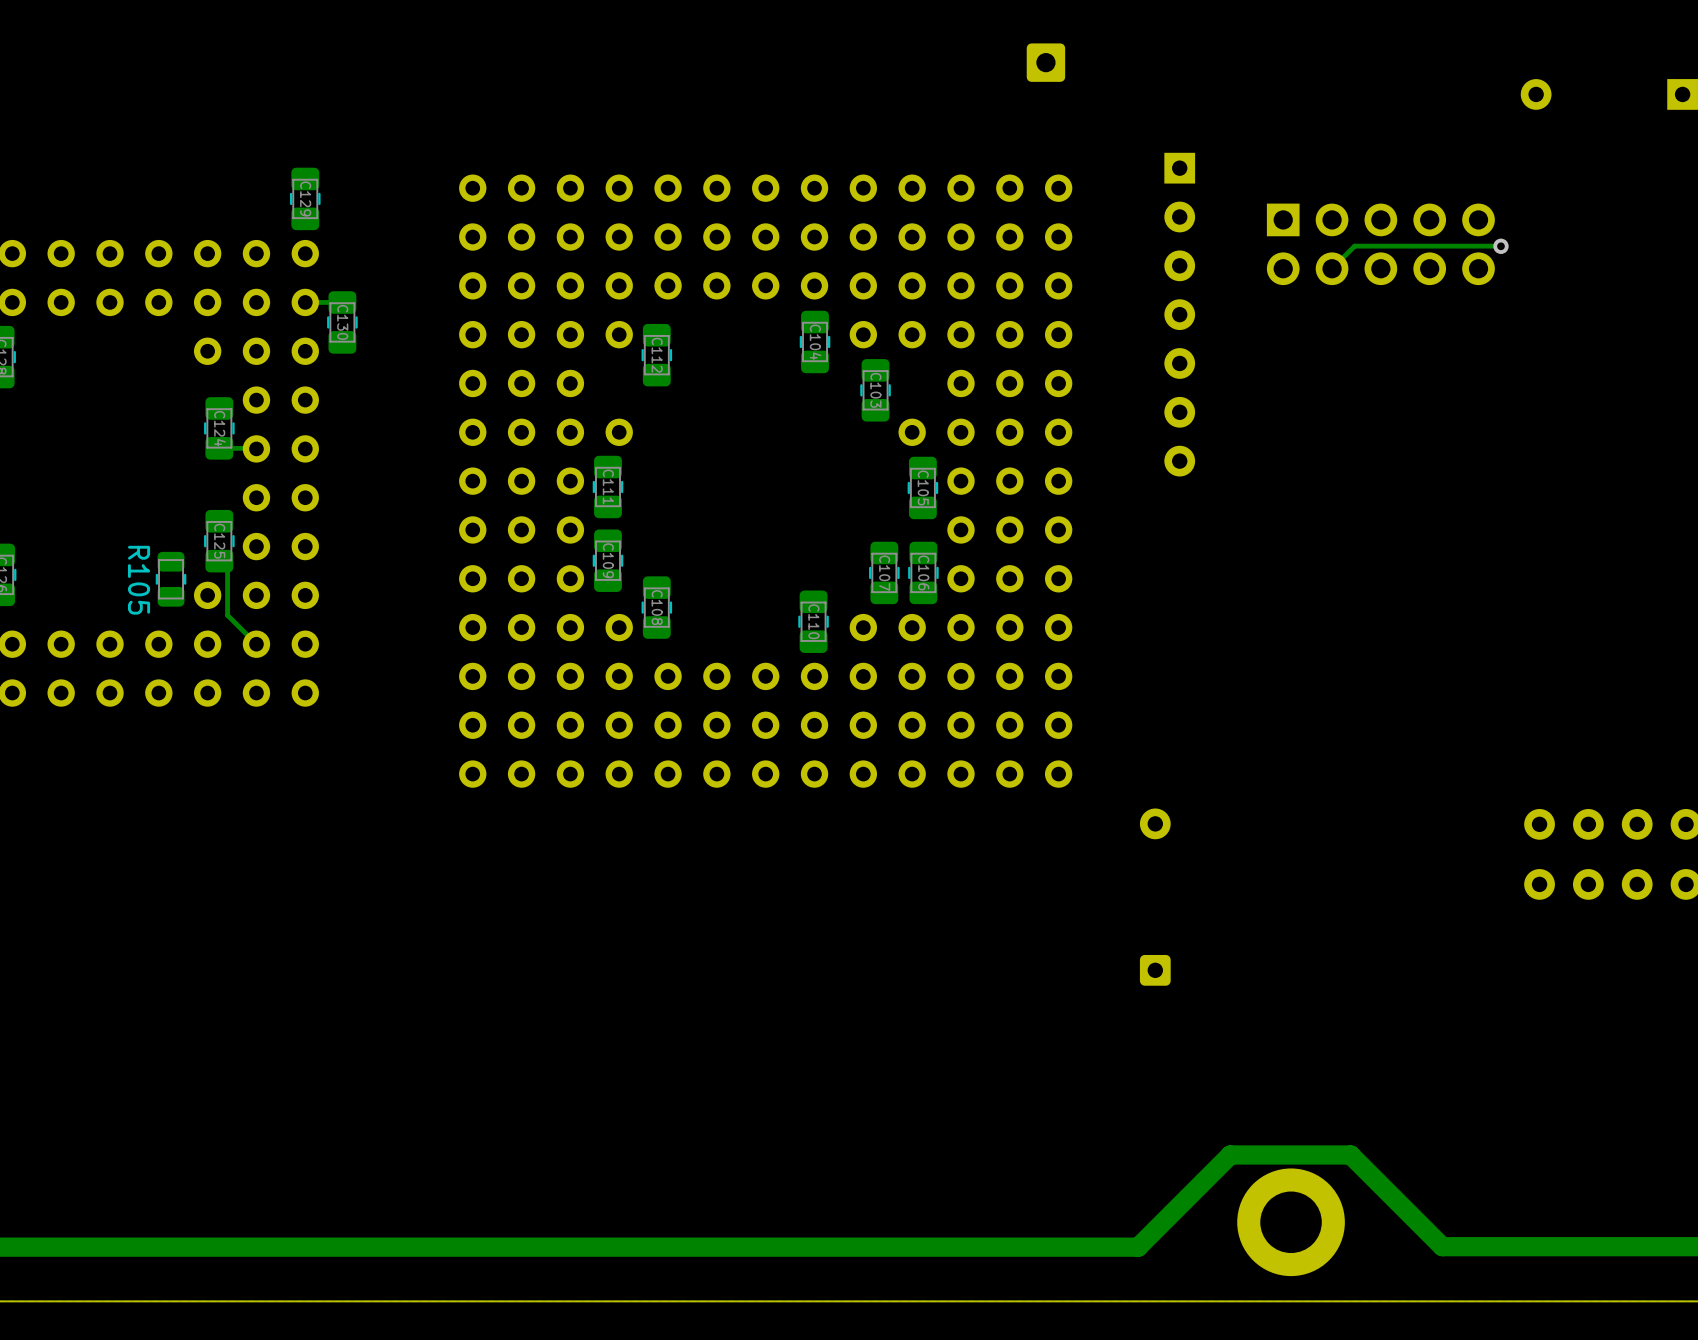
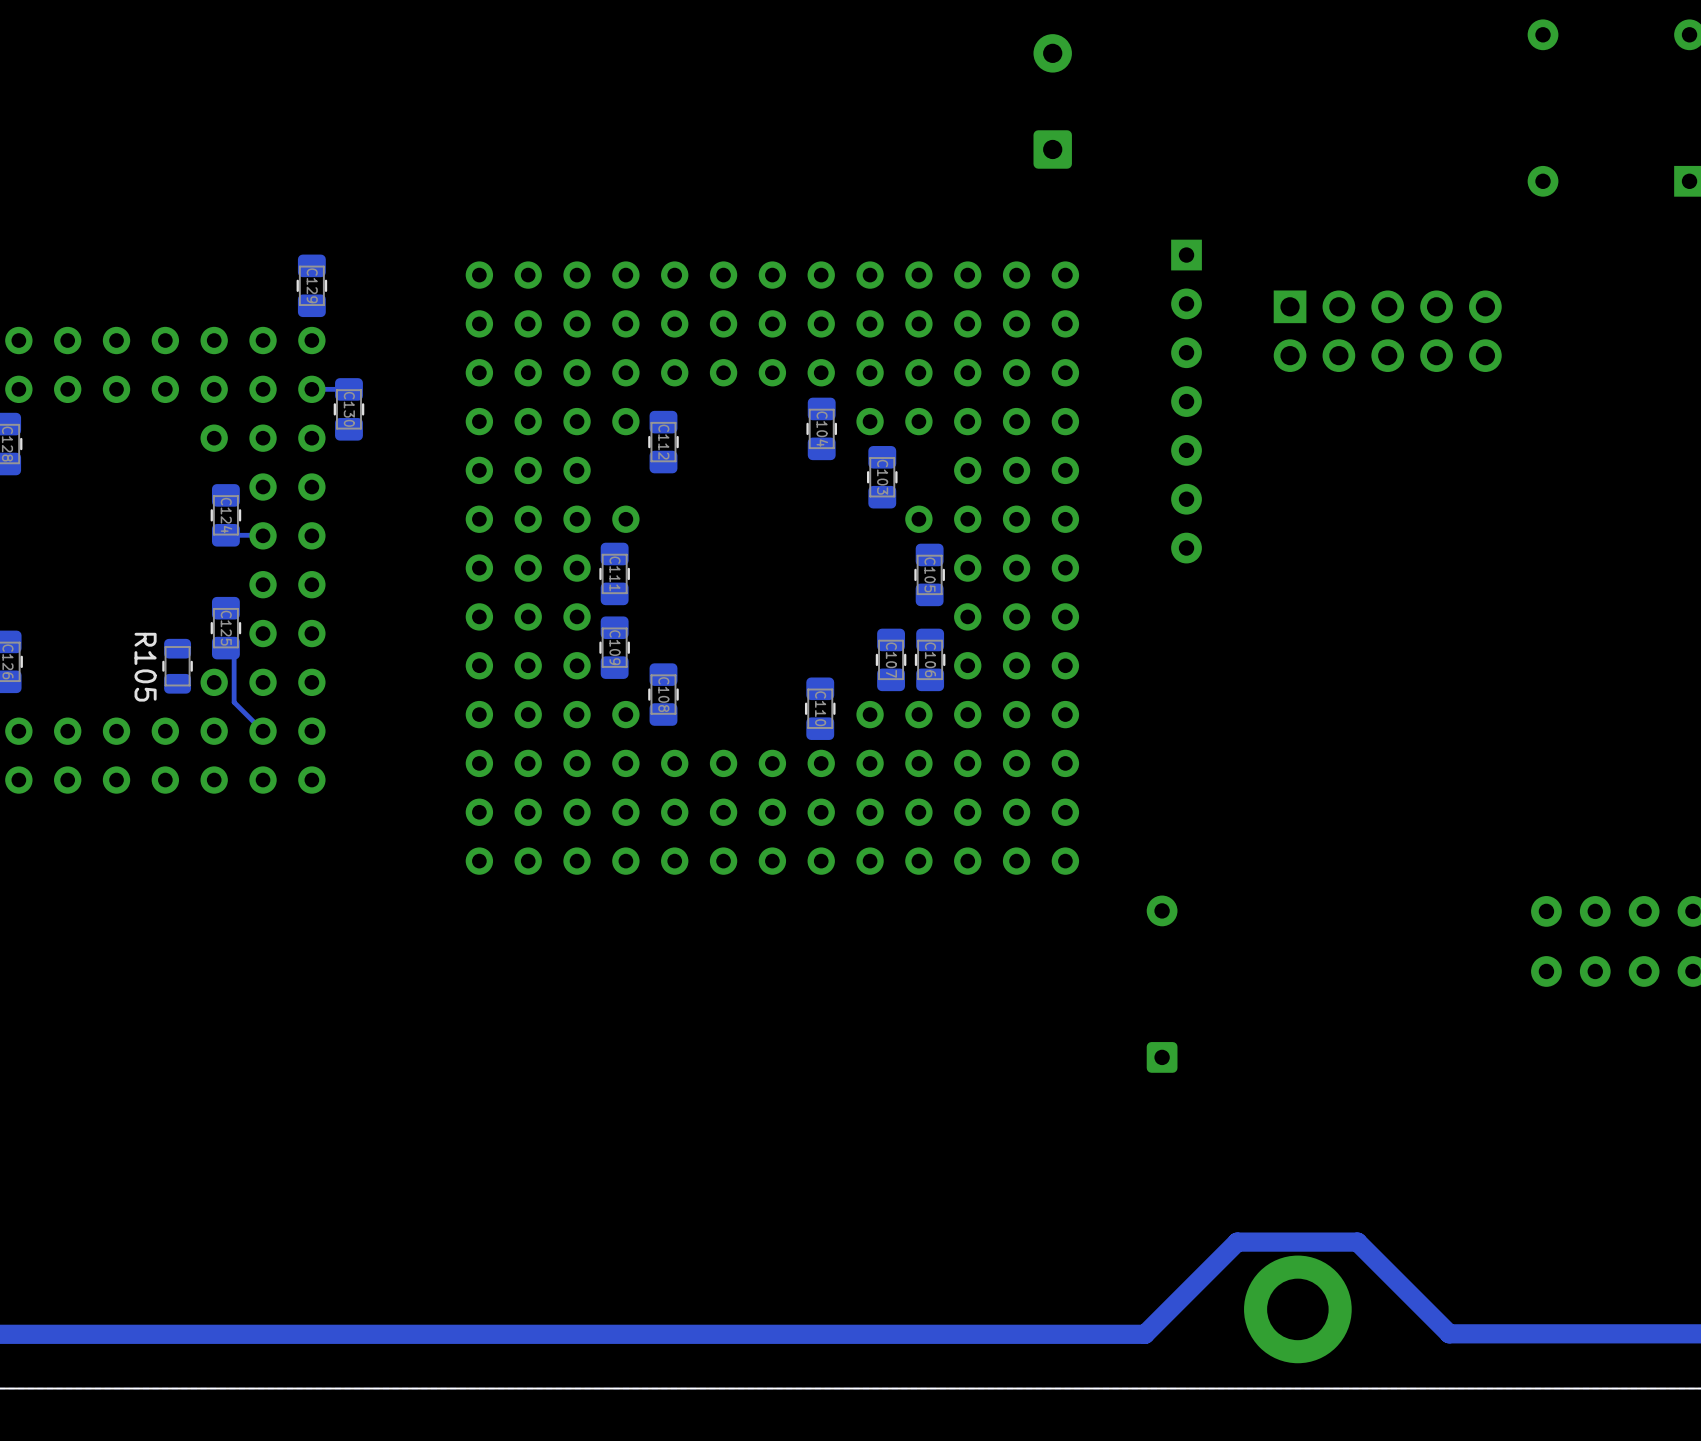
track: (1500, 246) (1354, 246) (1332, 268) -> none
via: (1500, 246) -> none

